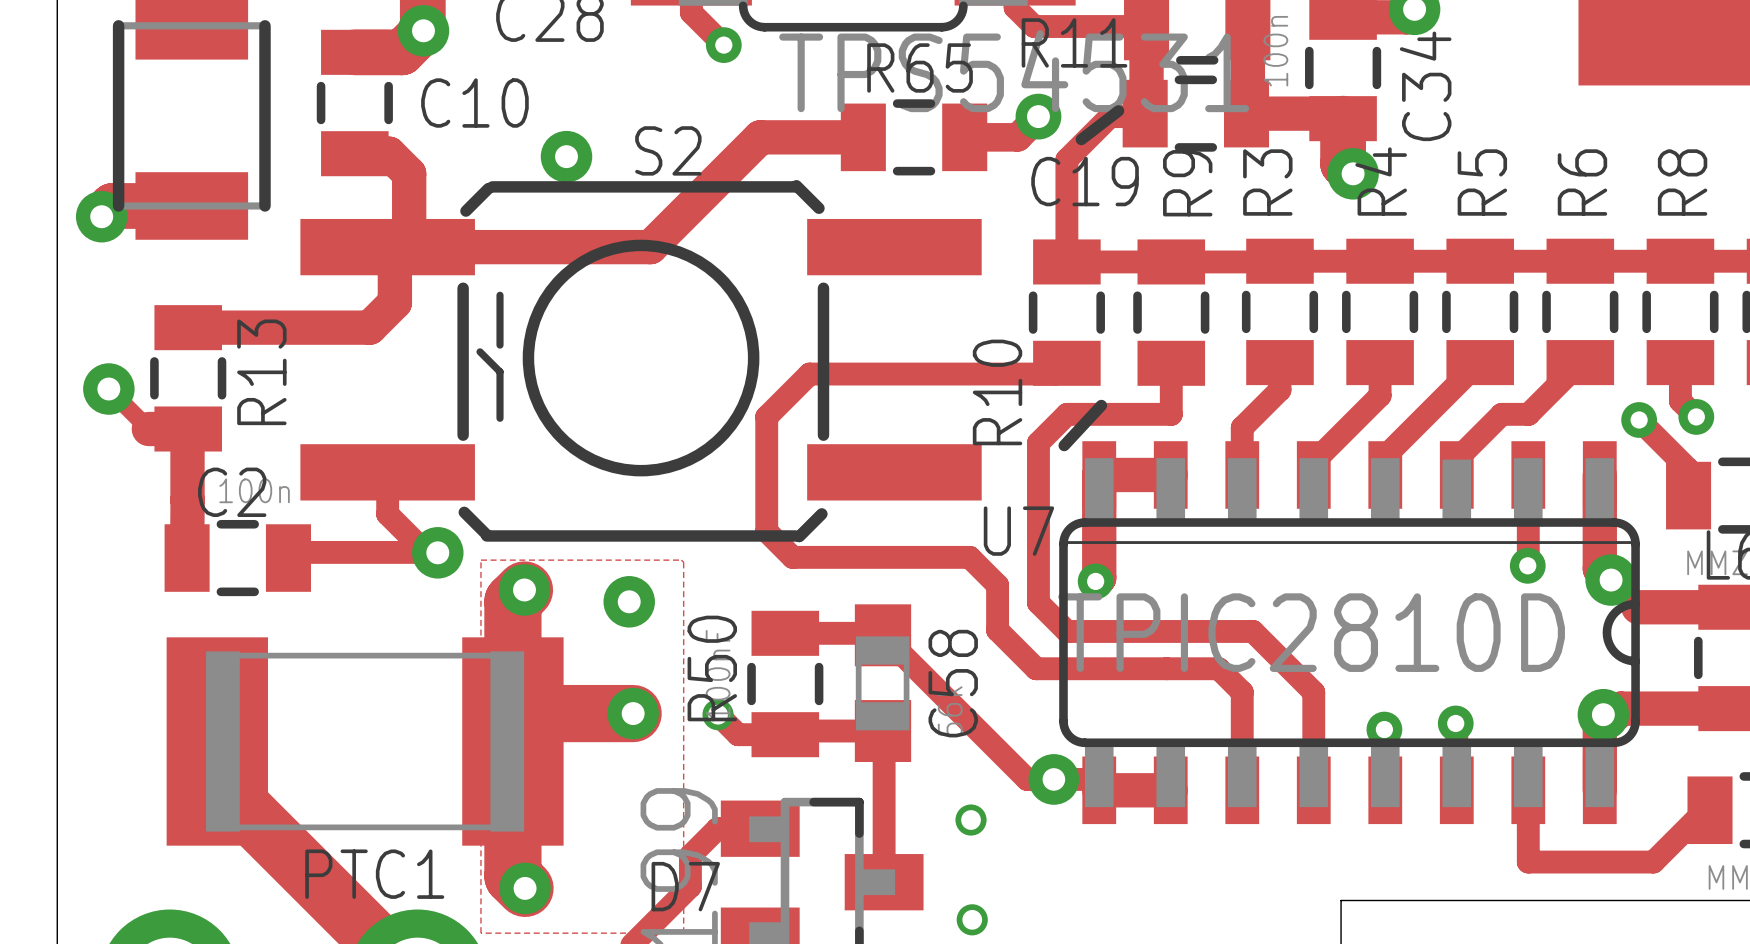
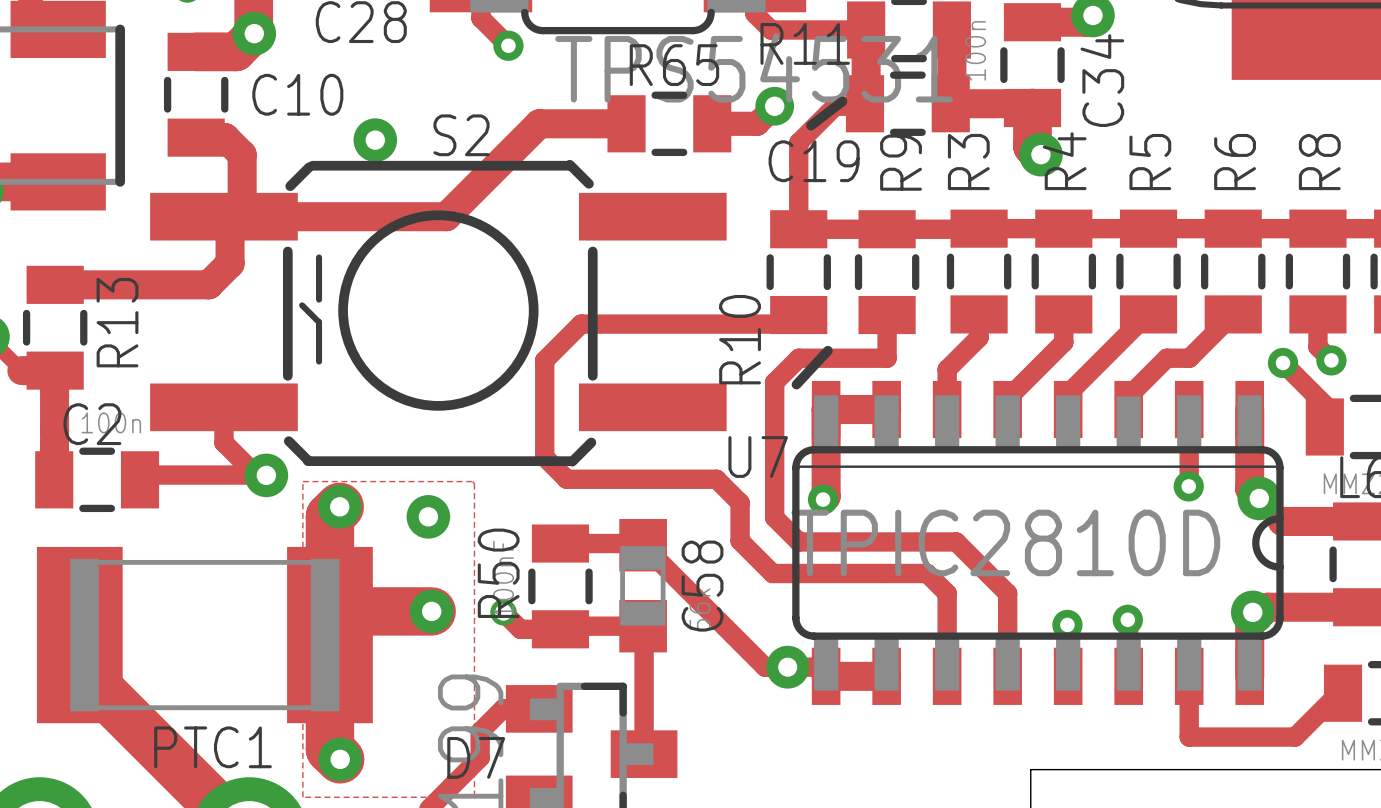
via: (971, 820) -> none
via: (972, 919) -> none

